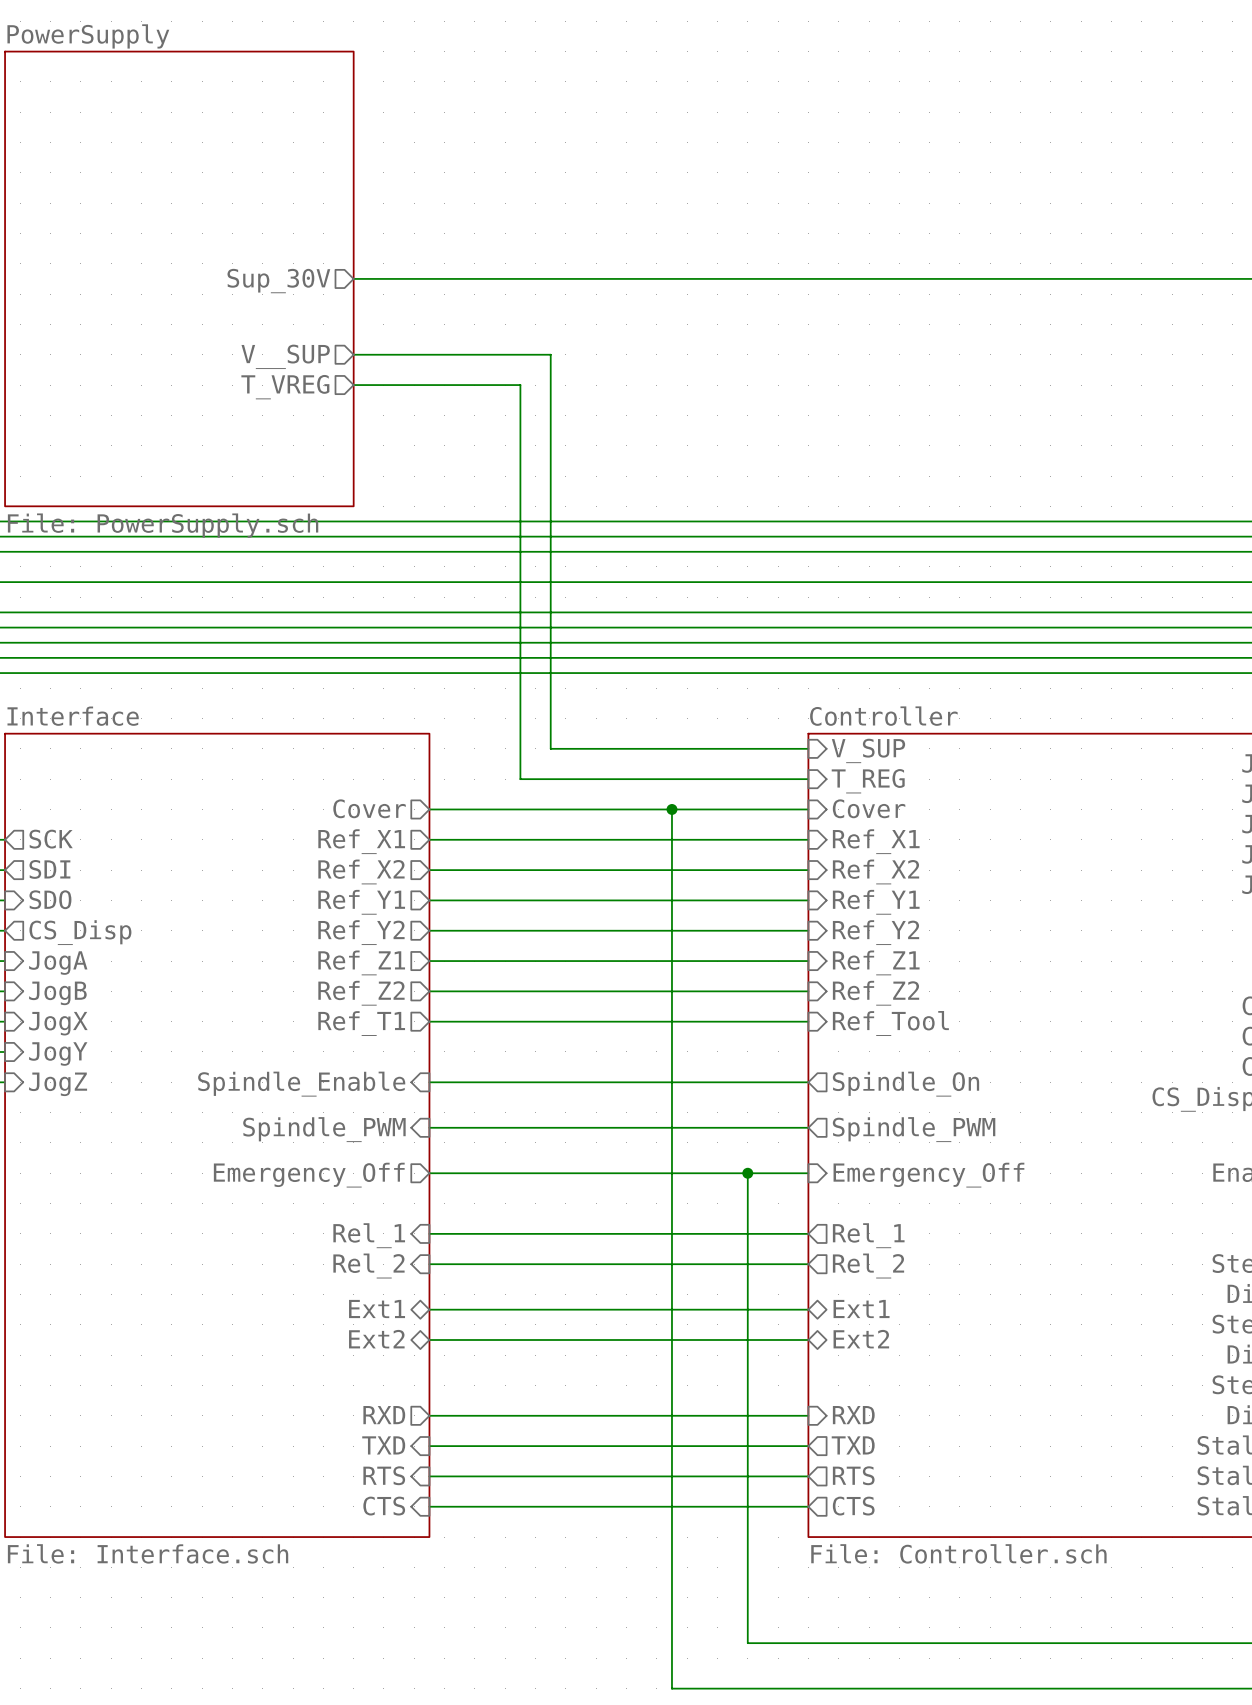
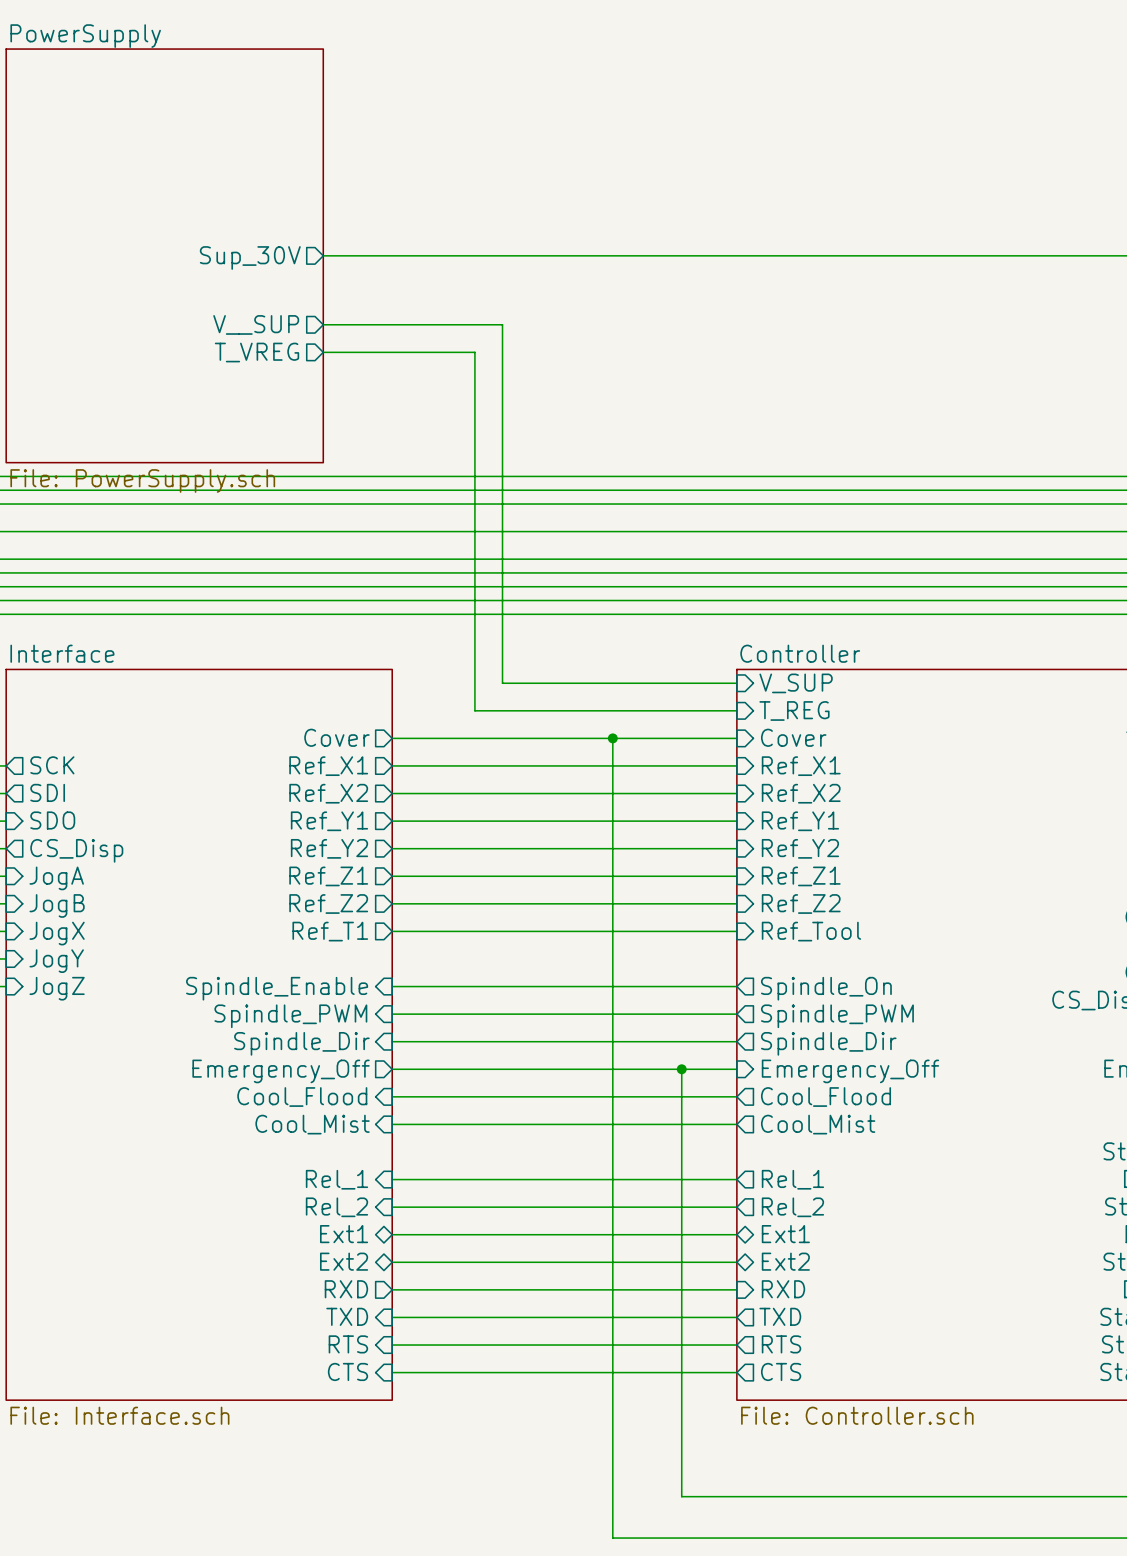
wire: (429, 1127) (808, 1127) -> (392, 1014) (736, 1014)
sheet pin position: Spindle_PWM (324, 1129) -> Spindle_PWM (290, 1016)
sheet pin position: Spindle_PWM (914, 1129) -> Spindle_PWM (837, 1016)
wire: none -> (392, 1041) (736, 1041)
sheet pin: none -> Spindle_Dir (301, 1043)
sheet pin: none -> Spindle_Dir (828, 1043)
sheet pin: none -> Cool_Flood (302, 1097)
sheet pin: none -> Cool_Flood (826, 1097)
sheet pin: Rel_1 (369, 1235) -> Cool_Mist (312, 1124)
sheet pin: Rel_1 (868, 1235) -> Cool_Mist (818, 1124)
wire: (429, 1264) (808, 1264) -> (392, 1096) (736, 1096)
sheet pin position: Rel_2 (368, 1266) -> Rel_2 (336, 1207)
sheet pin position: Rel_2 (868, 1266) -> Rel_2 (792, 1207)
sheet pin: none -> Rel_1 (336, 1179)
sheet pin: none -> Rel_1 (792, 1179)
sheet pin position: Ext1 (377, 1309) -> Ext1 (344, 1234)
wire: (429, 1309) (808, 1309) -> (392, 1179) (736, 1179)
sheet pin position: Ext1 (861, 1309) -> Ext1 (785, 1234)
wire: none -> (392, 1207) (736, 1207)
sheet pin position: Ext2 (376, 1339) -> Ext2 (344, 1261)
wire: (429, 1339) (808, 1339) -> (392, 1234) (736, 1234)
sheet pin position: Ext2 (861, 1339) -> Ext2 (785, 1261)
wire: none -> (392, 1262) (736, 1262)

